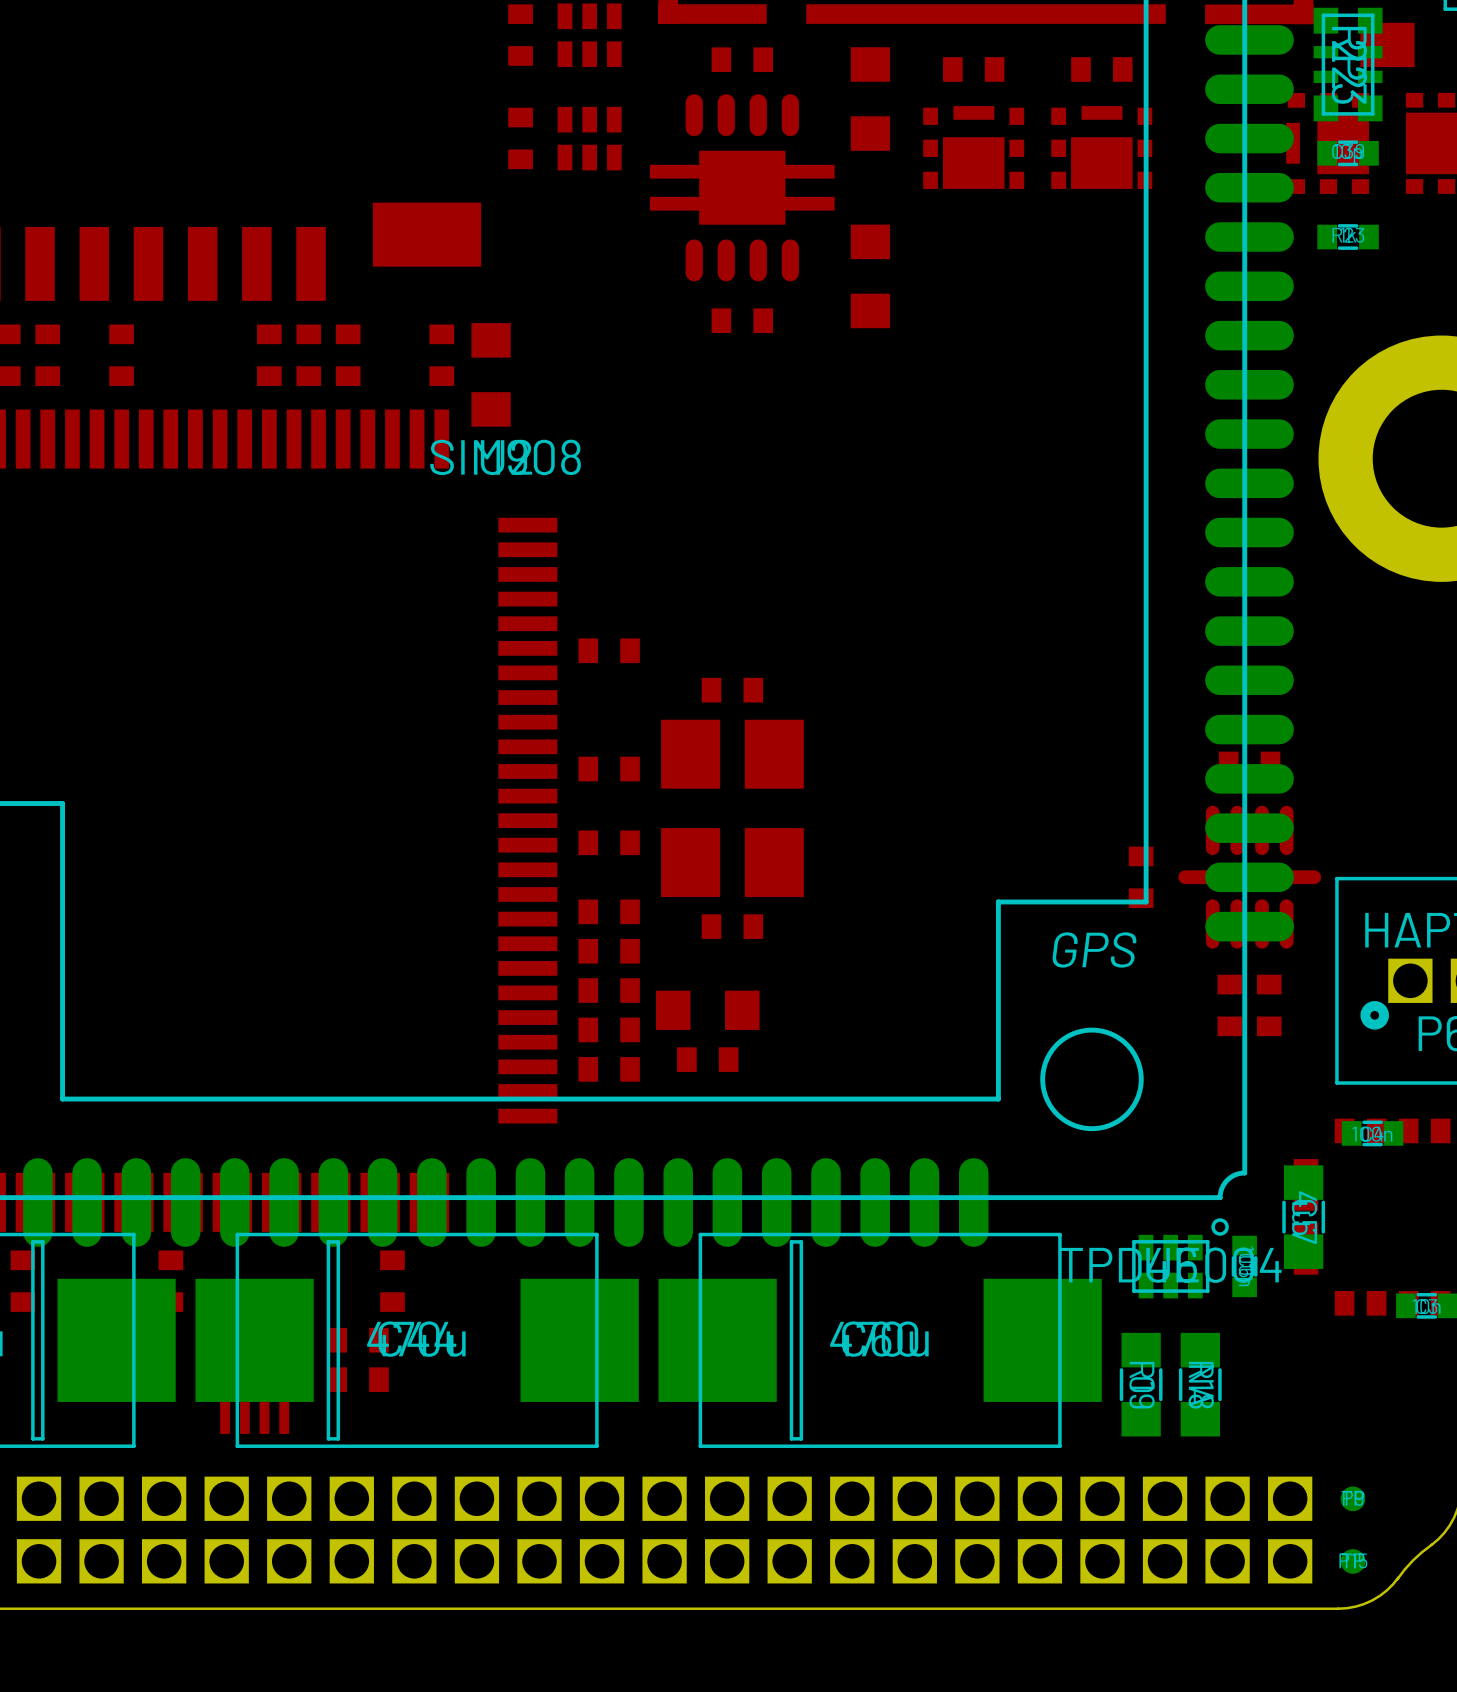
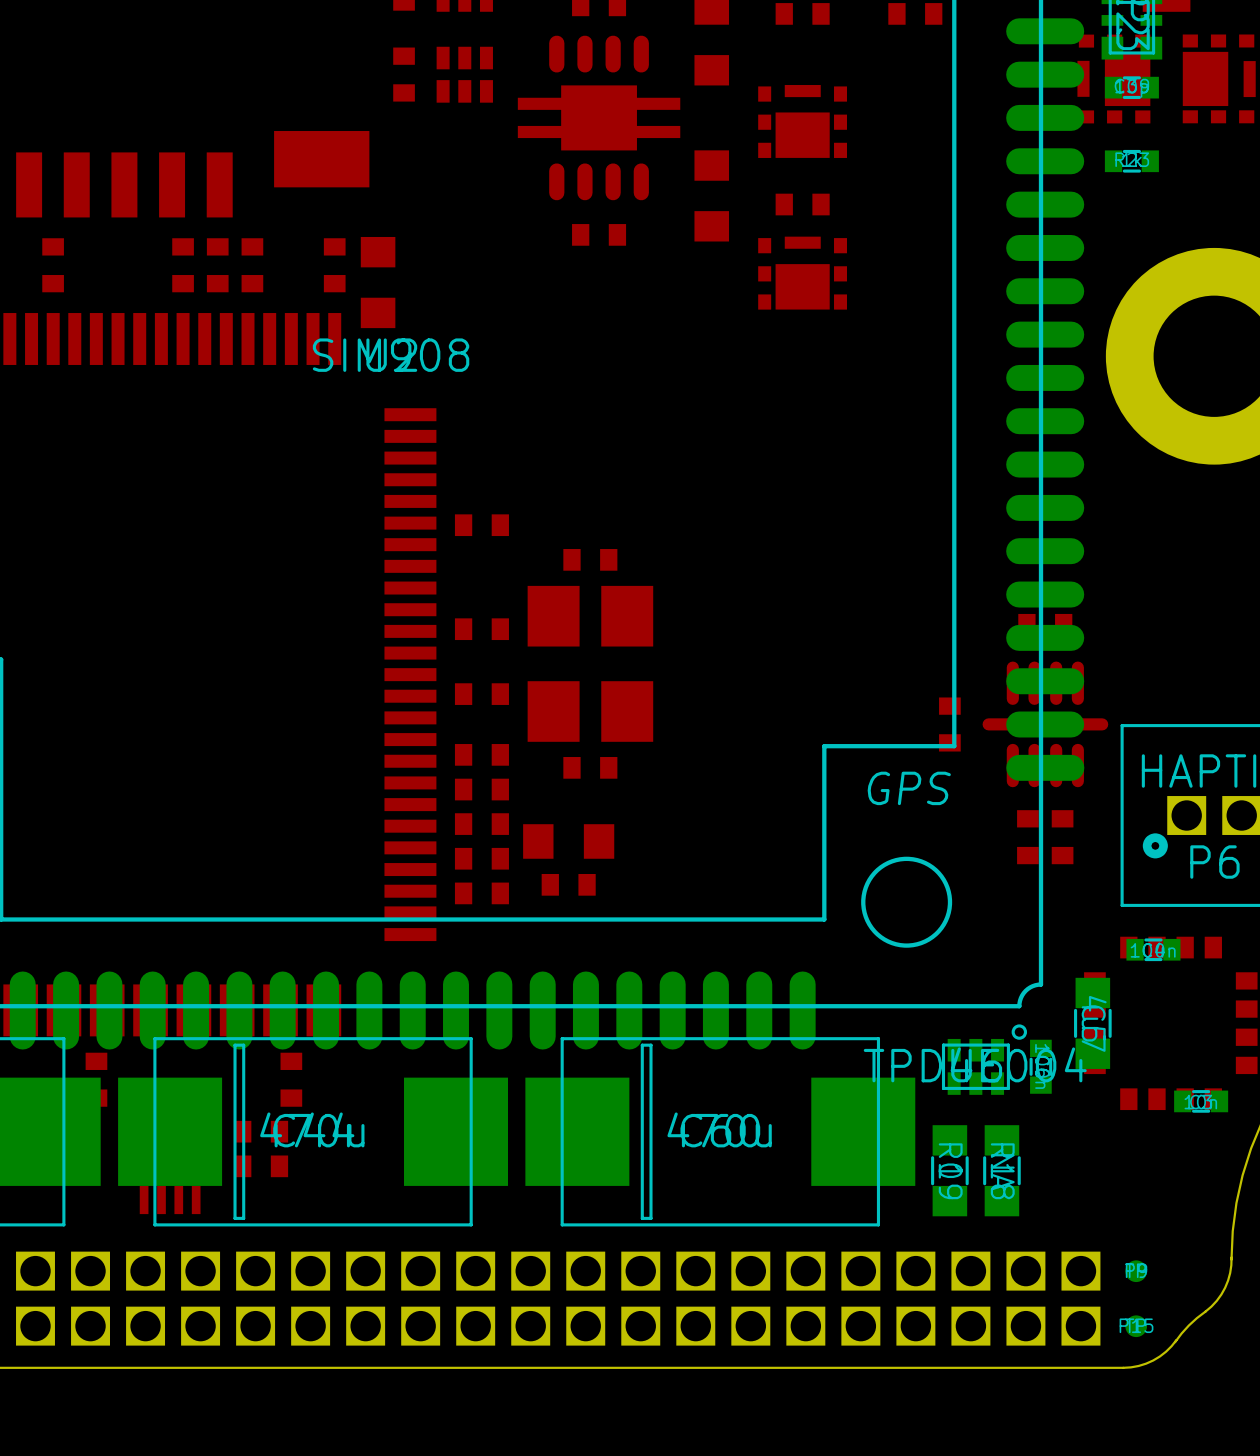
part position: (973, 147) -> (802, 121)
part position: (1101, 147) -> (802, 273)
part: none -> (802, 204)

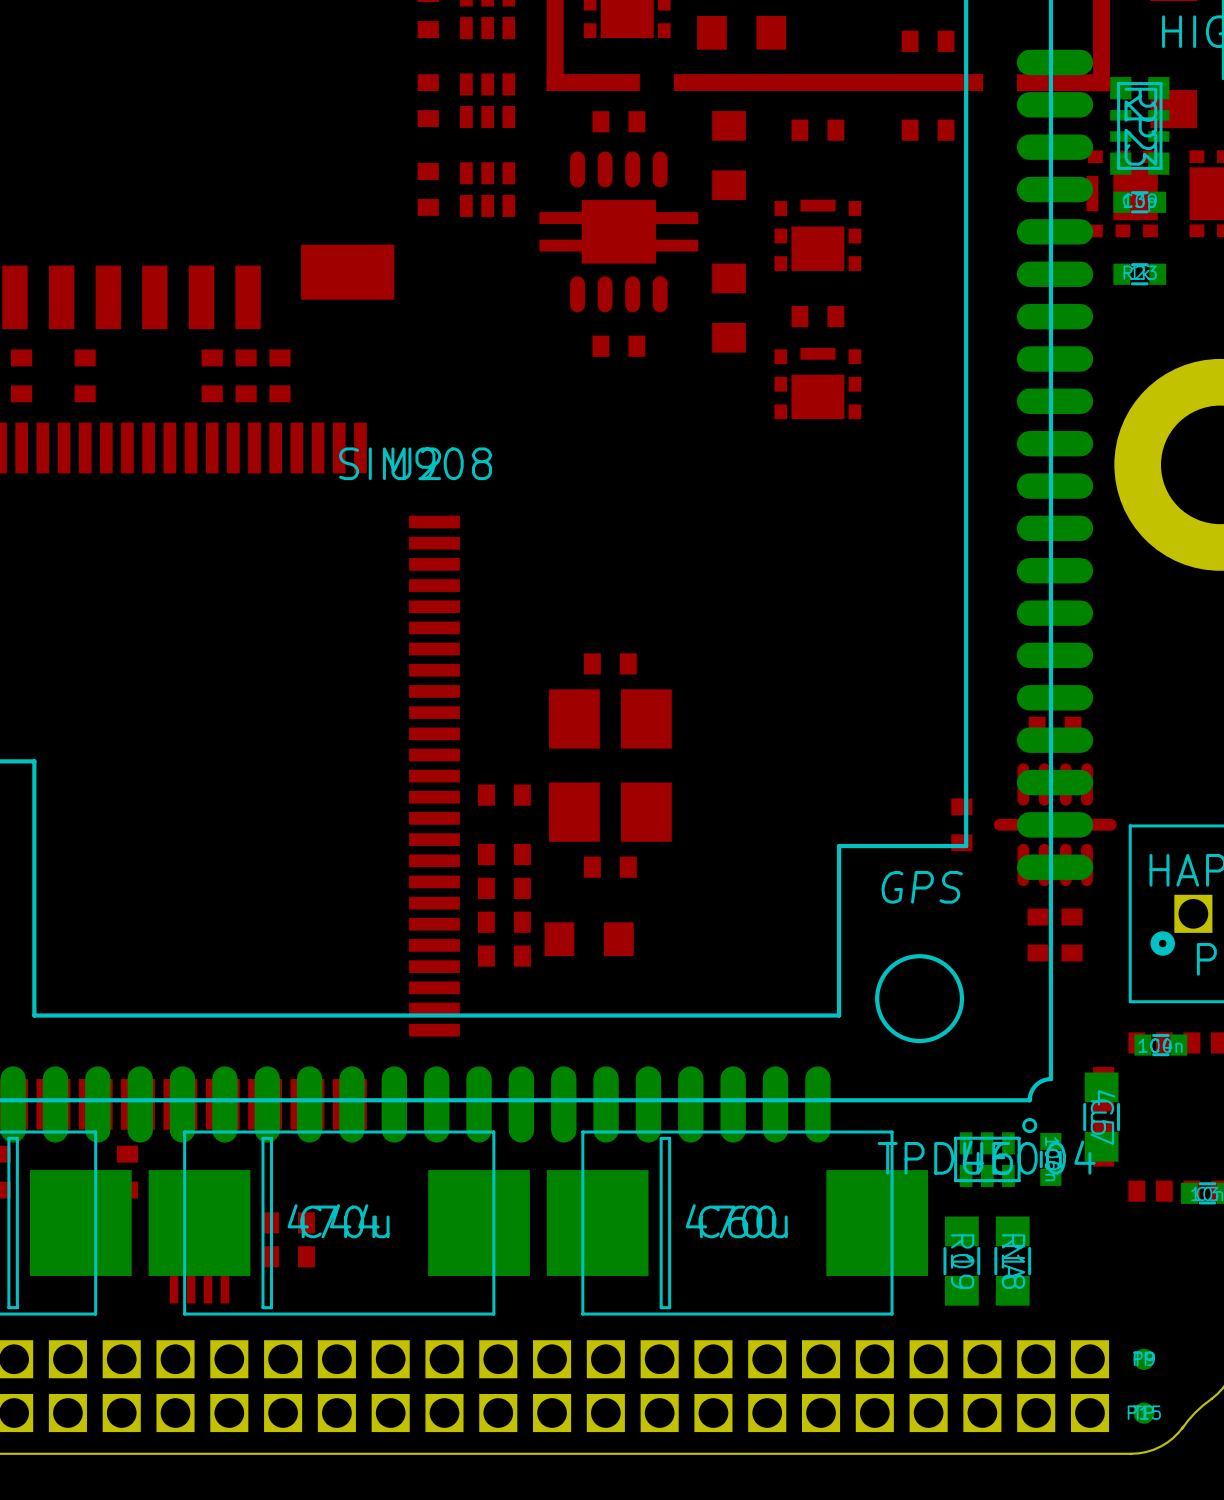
part: (334, 265) -> none
part: (378, 282) -> none
part: (481, 525) -> none
part: (481, 629) -> none
part: (568, 884) -> none
part: (481, 893) -> none
part: (291, 1079) -> none

